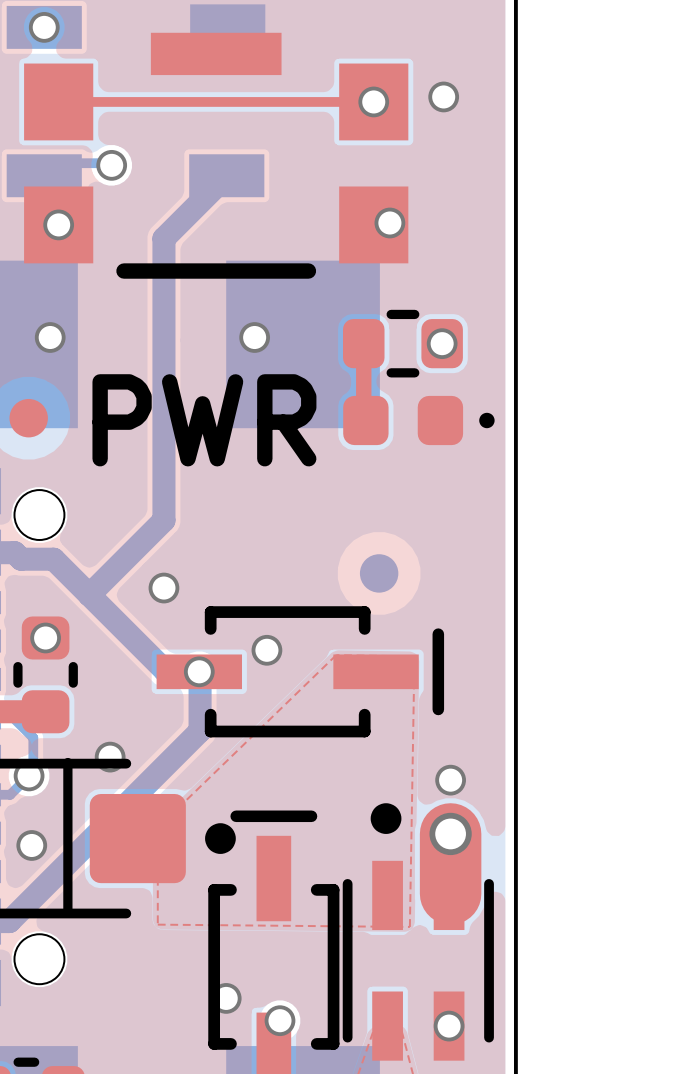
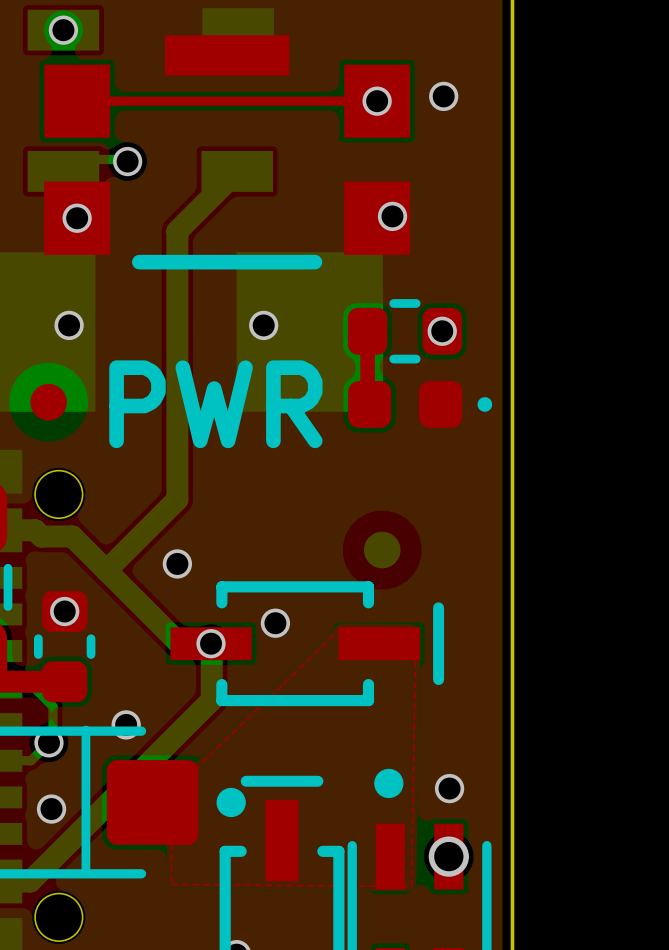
via position: (450, 780) -> (449, 788)
top track: (450, 833) (450, 893) -> none
via position: (450, 833) -> (448, 856)

